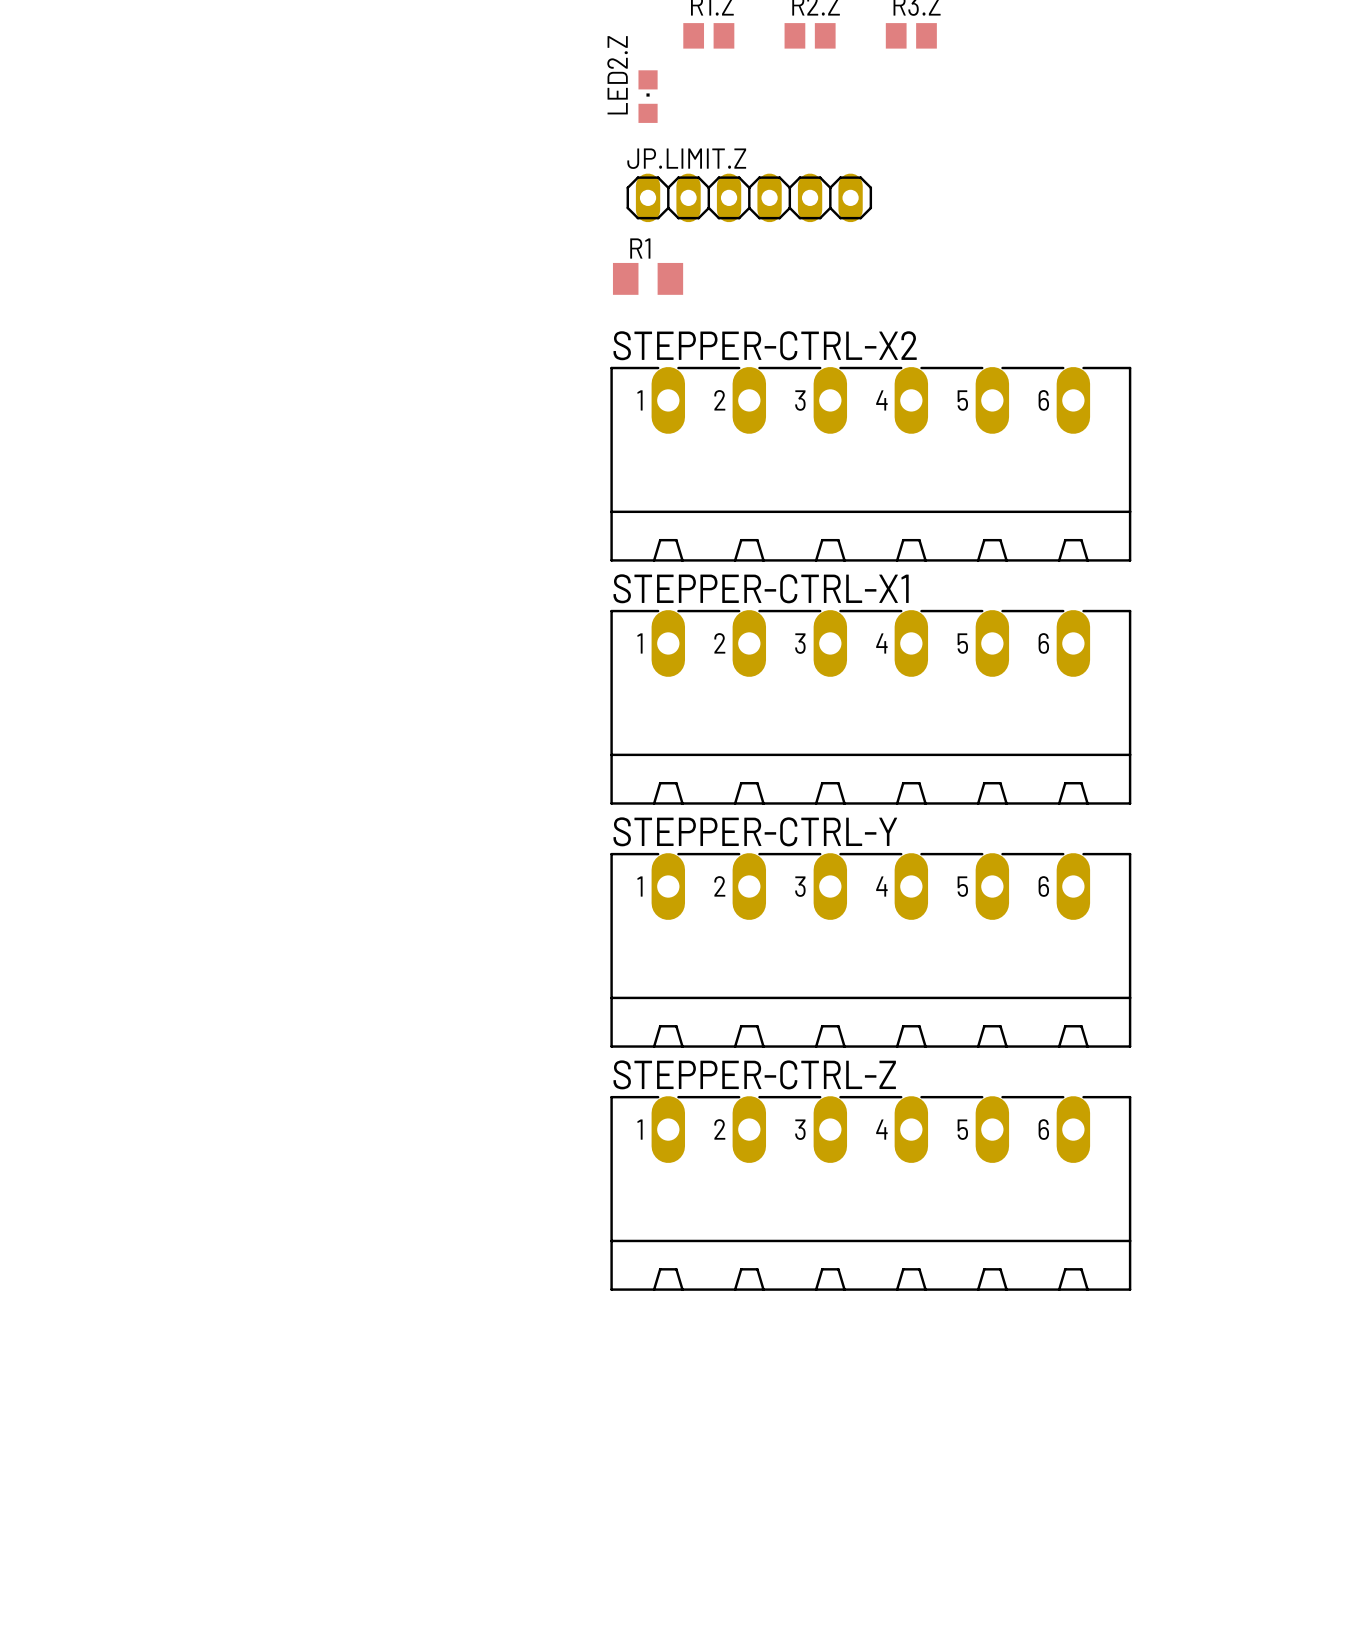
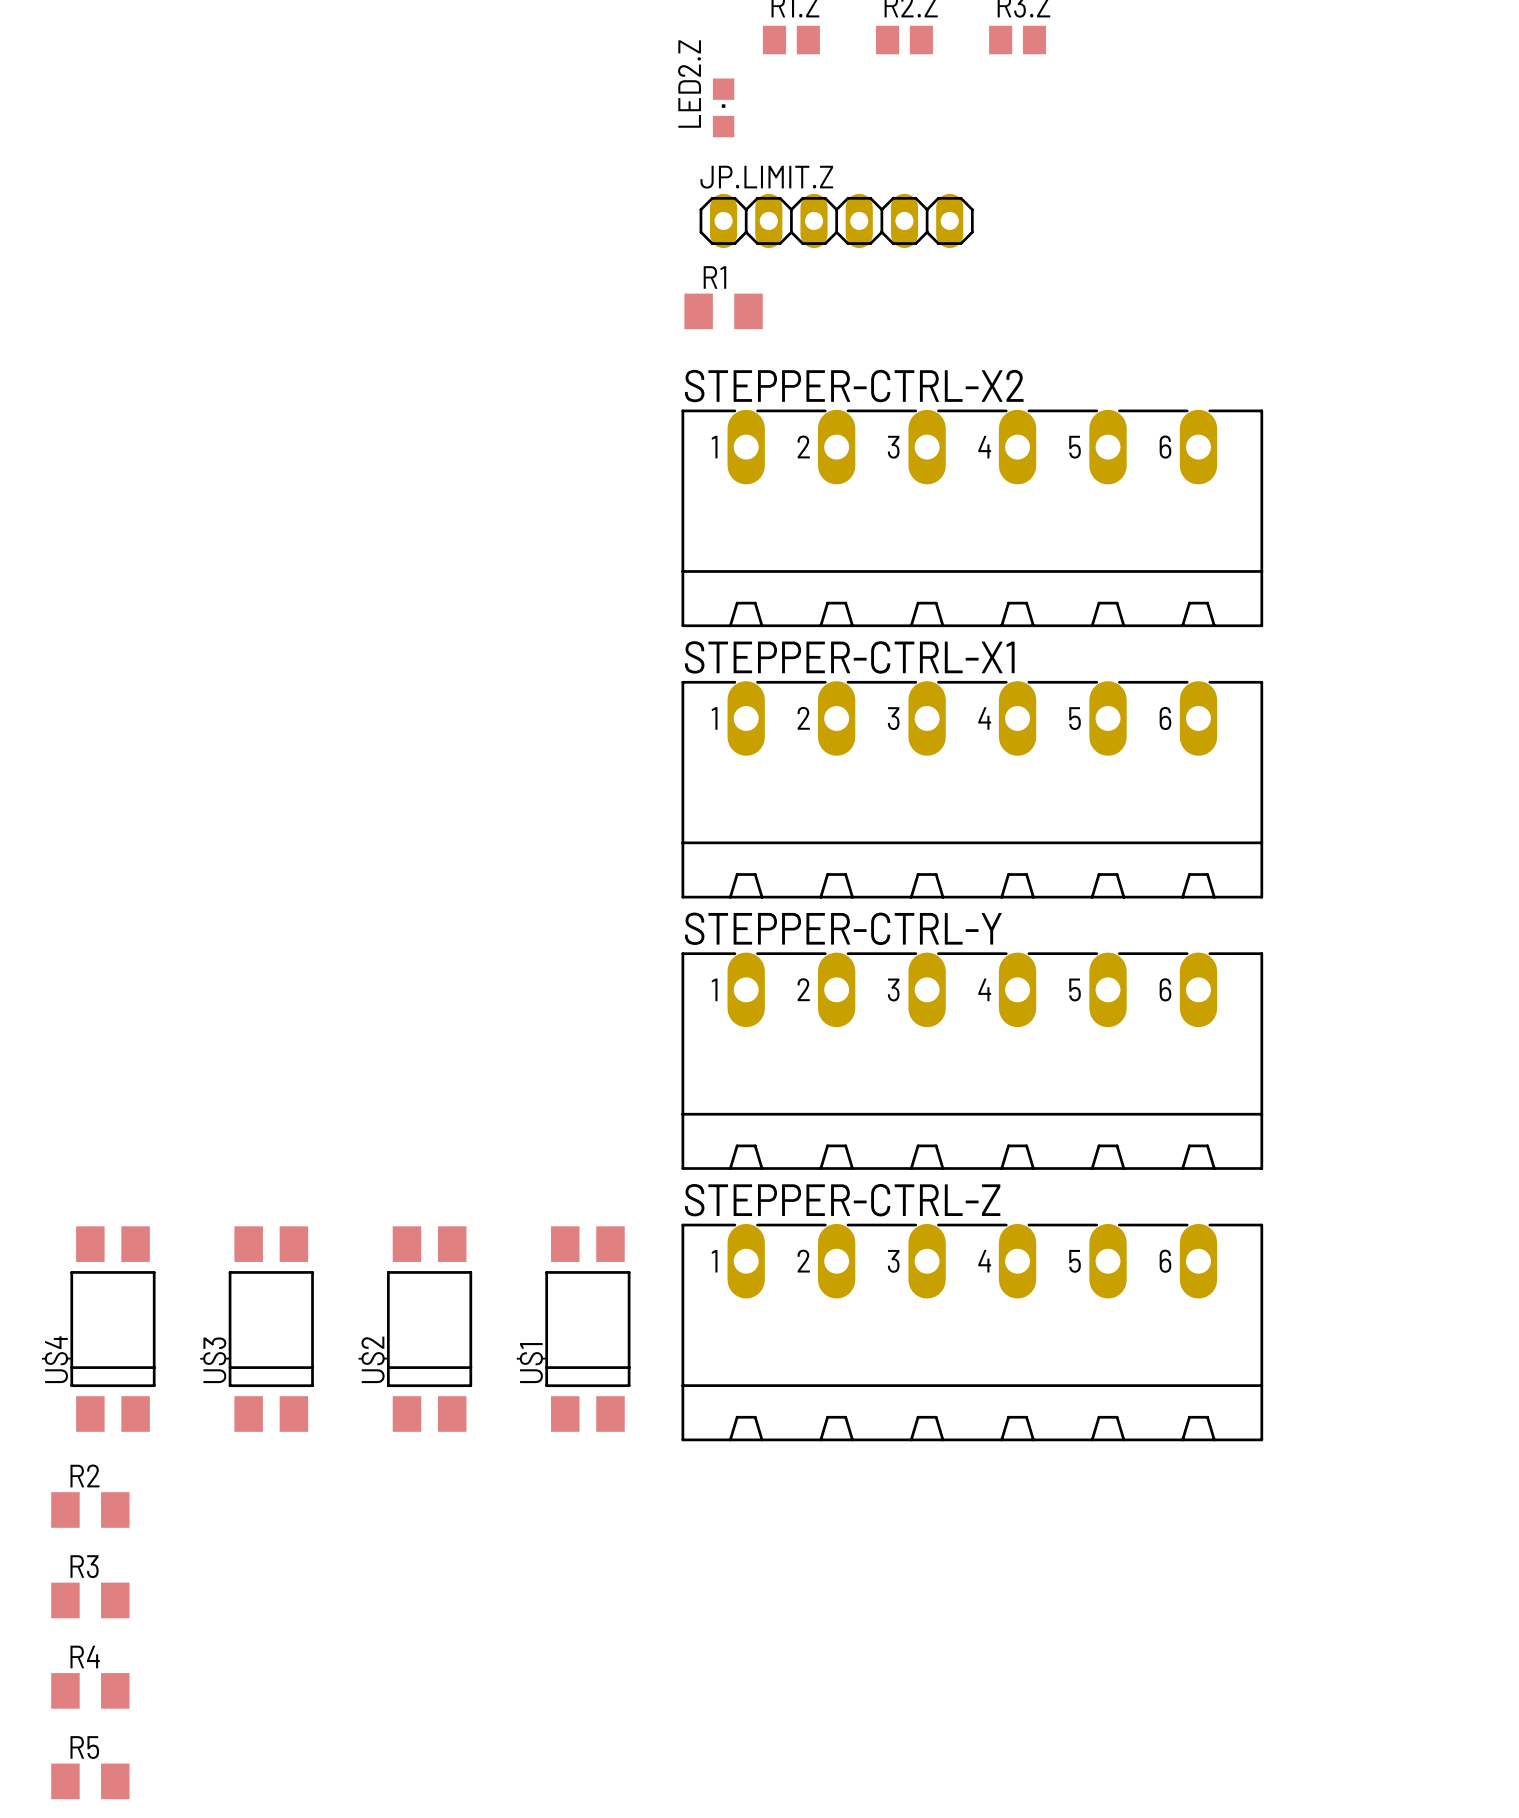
U$4: none -> (112, 1329)
U$3: none -> (271, 1329)
U$2: none -> (429, 1329)
U$1: none -> (587, 1329)
R2: none -> (90, 1509)
R3: none -> (90, 1600)
R4: none -> (90, 1690)
R5: none -> (90, 1781)

